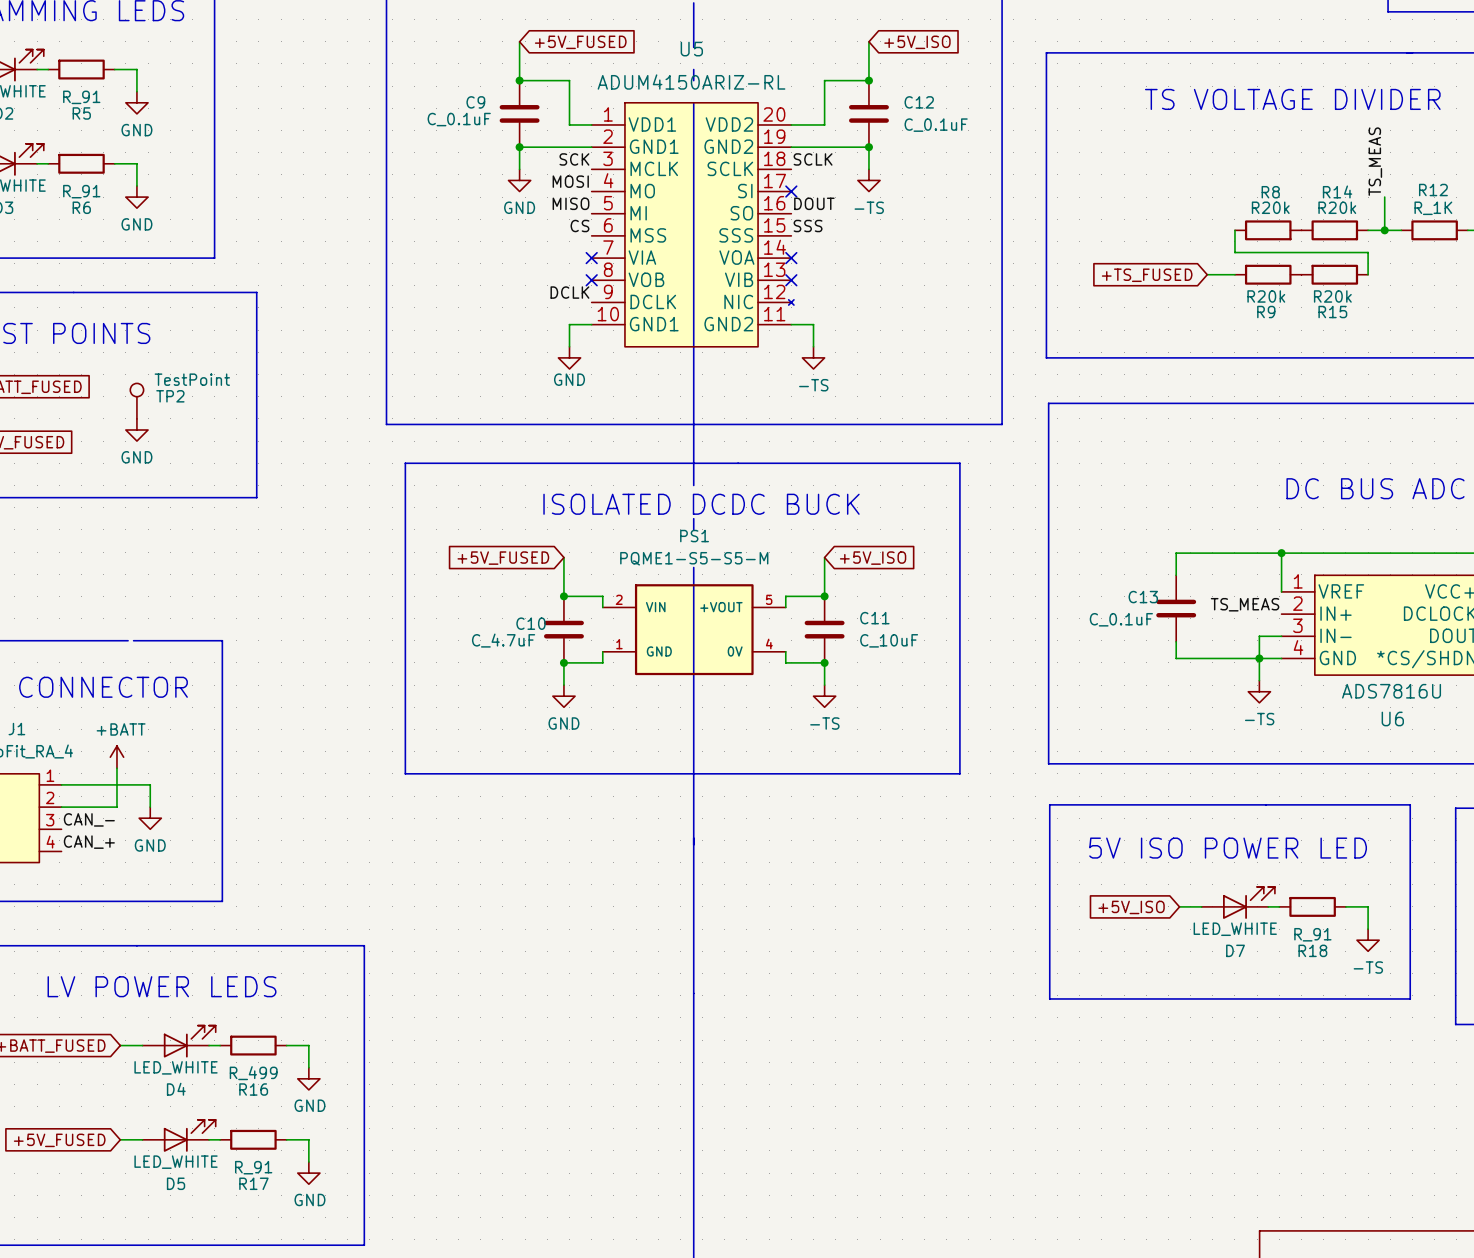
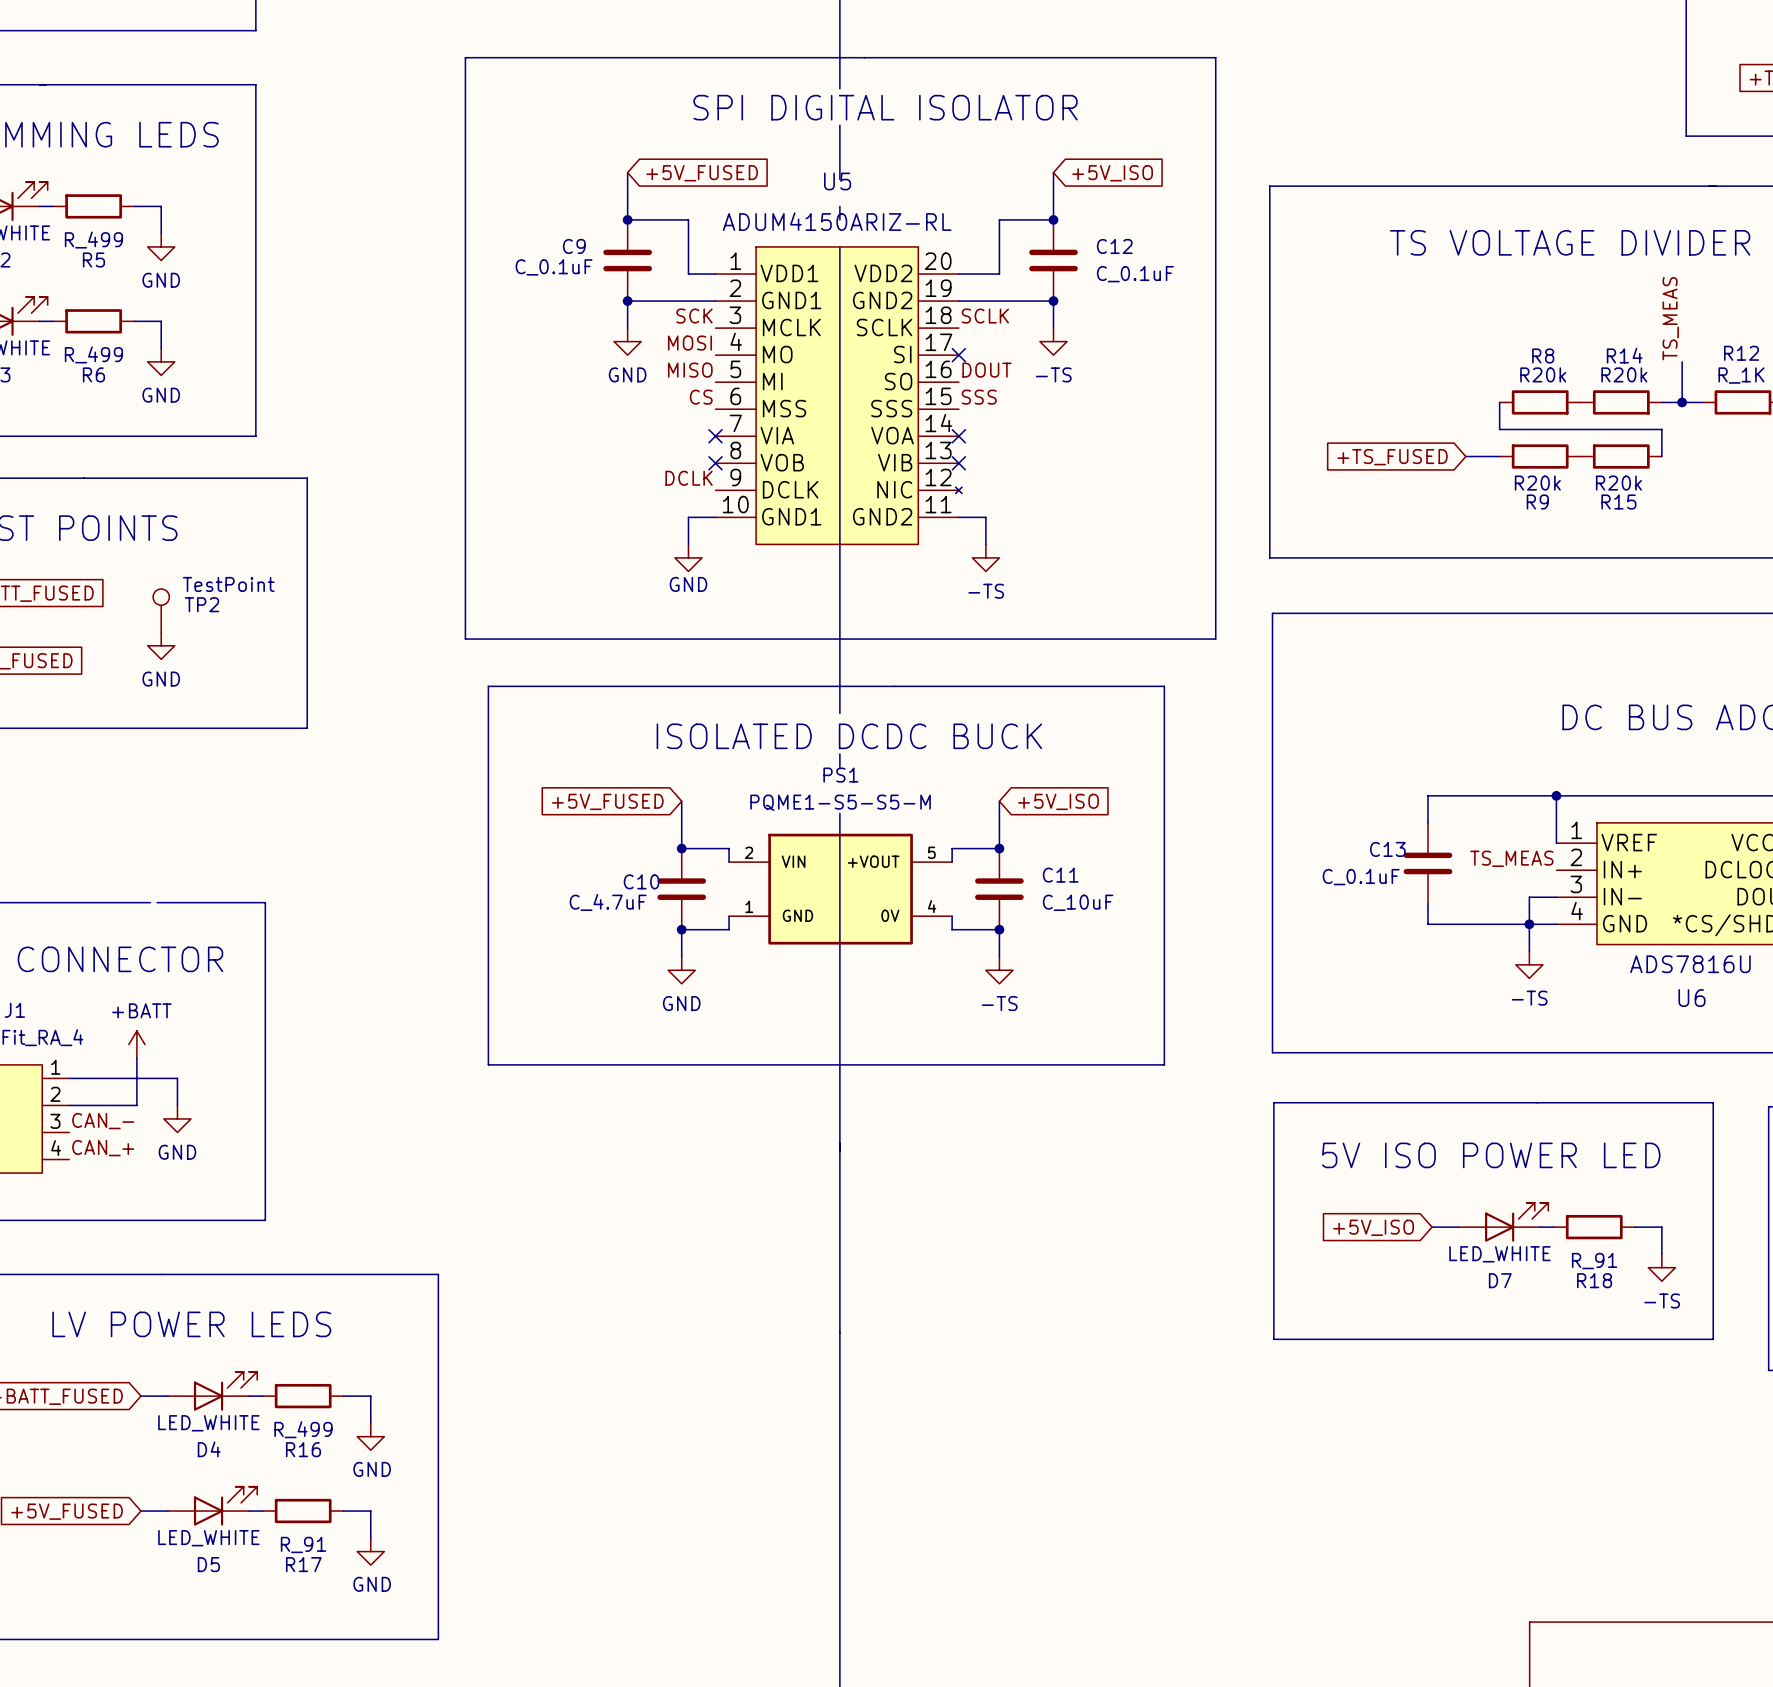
R5 value: R_91 (81, 97) -> R_499 (93, 240)
R6 value: R_91 (81, 191) -> R_499 (93, 354)

